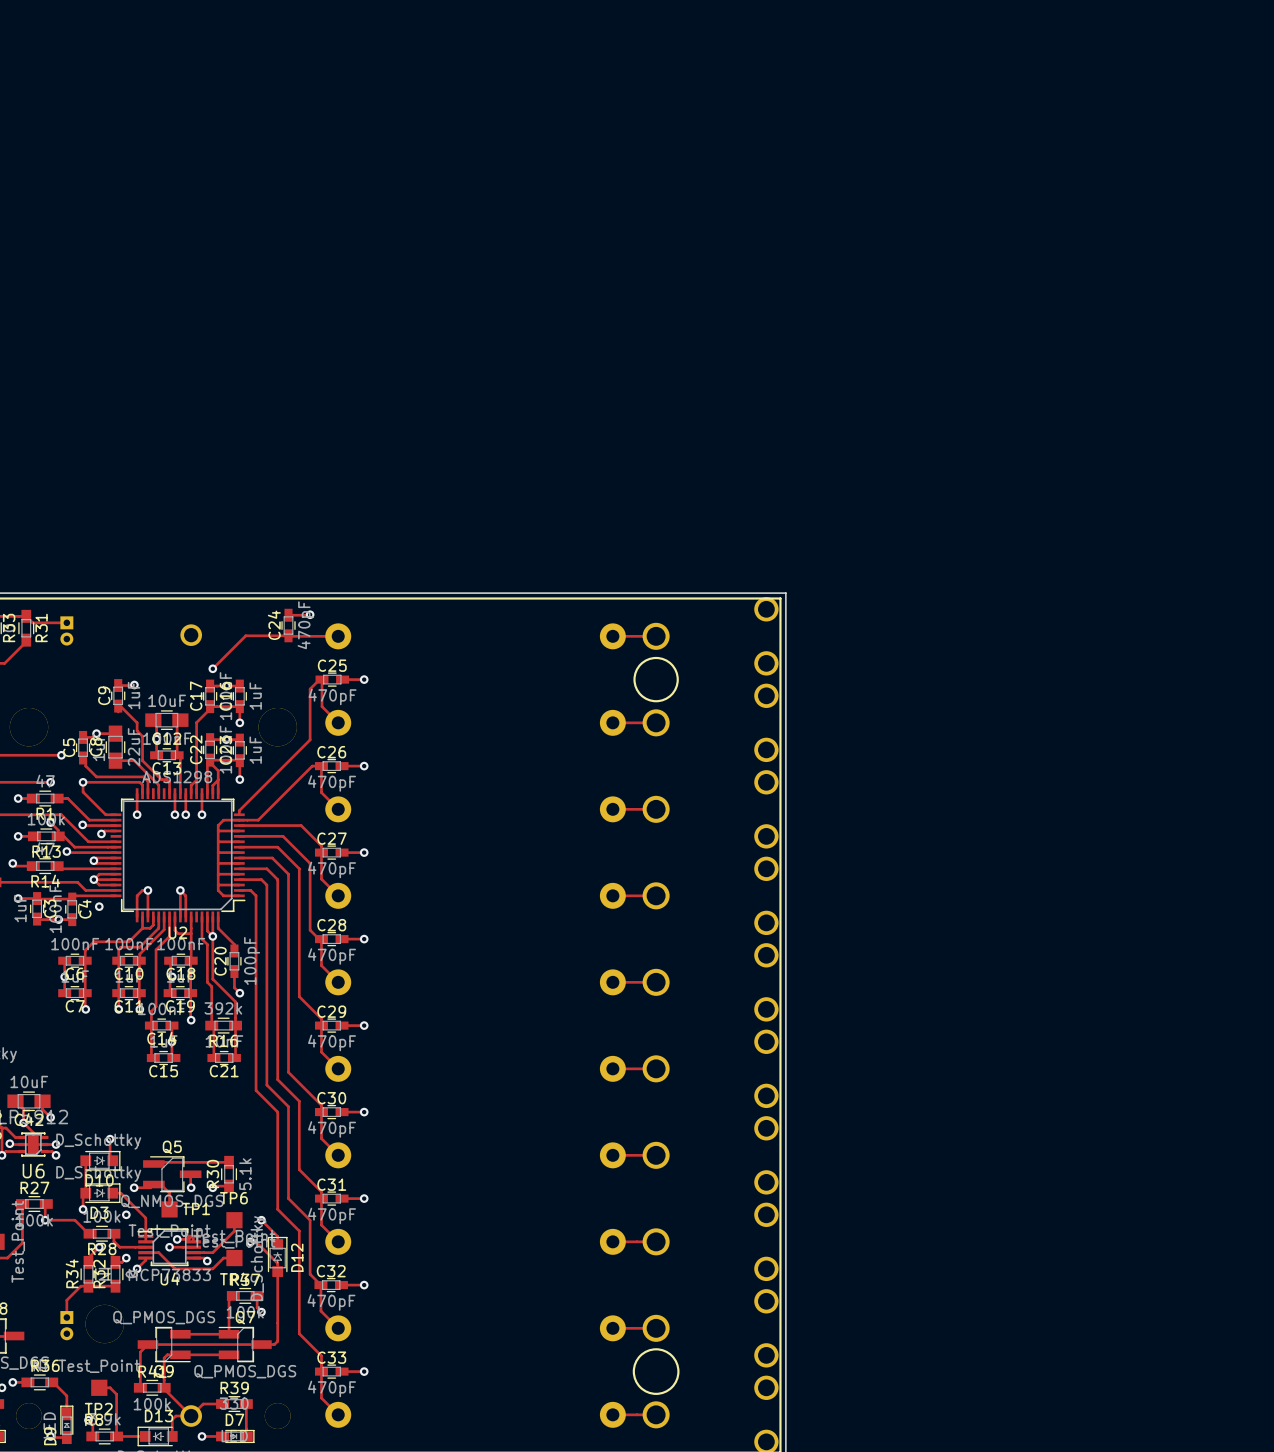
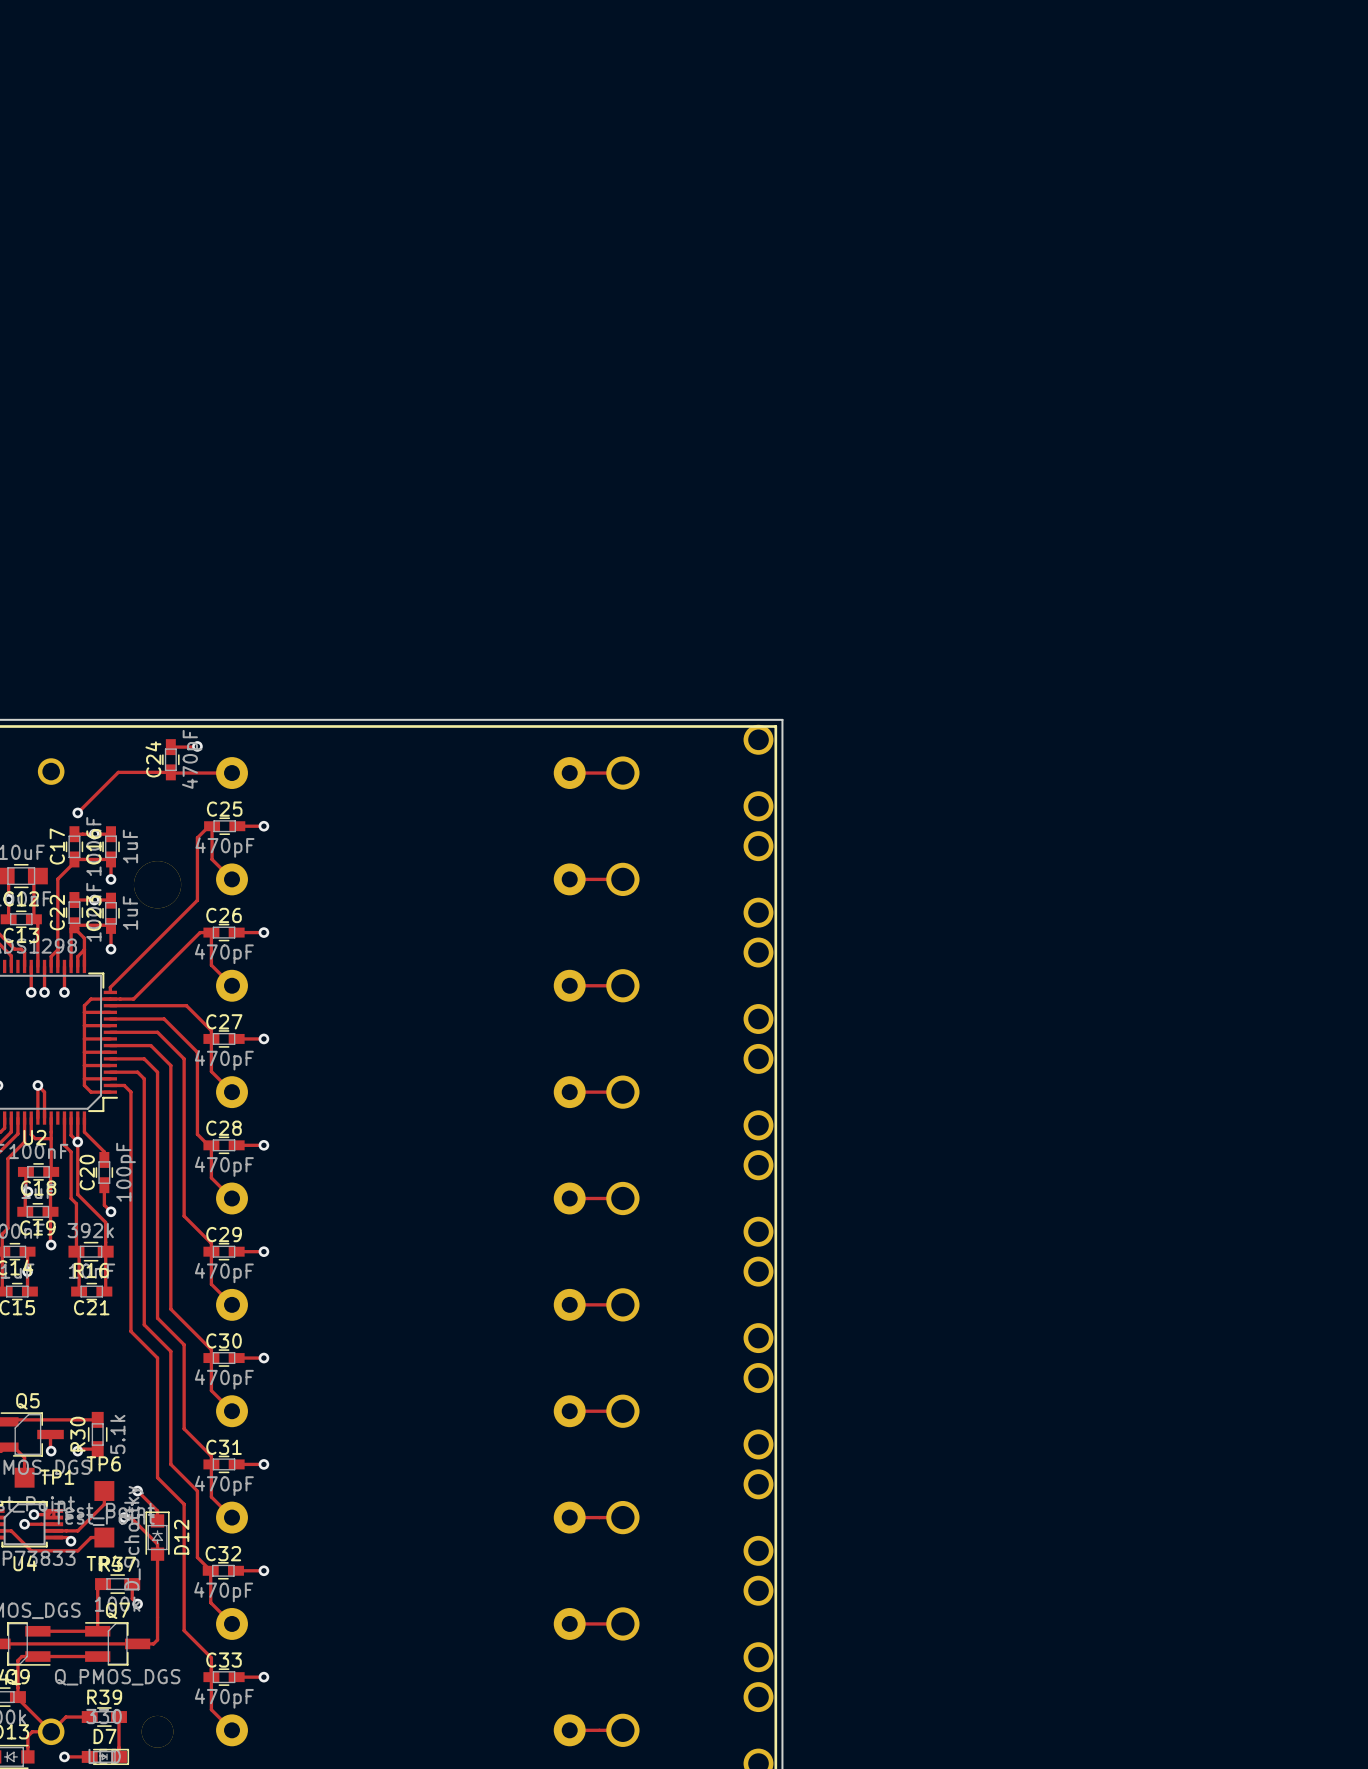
drawing: [633, 656, 679, 703] -> none
drawing: [632, 1348, 680, 1395] -> none

